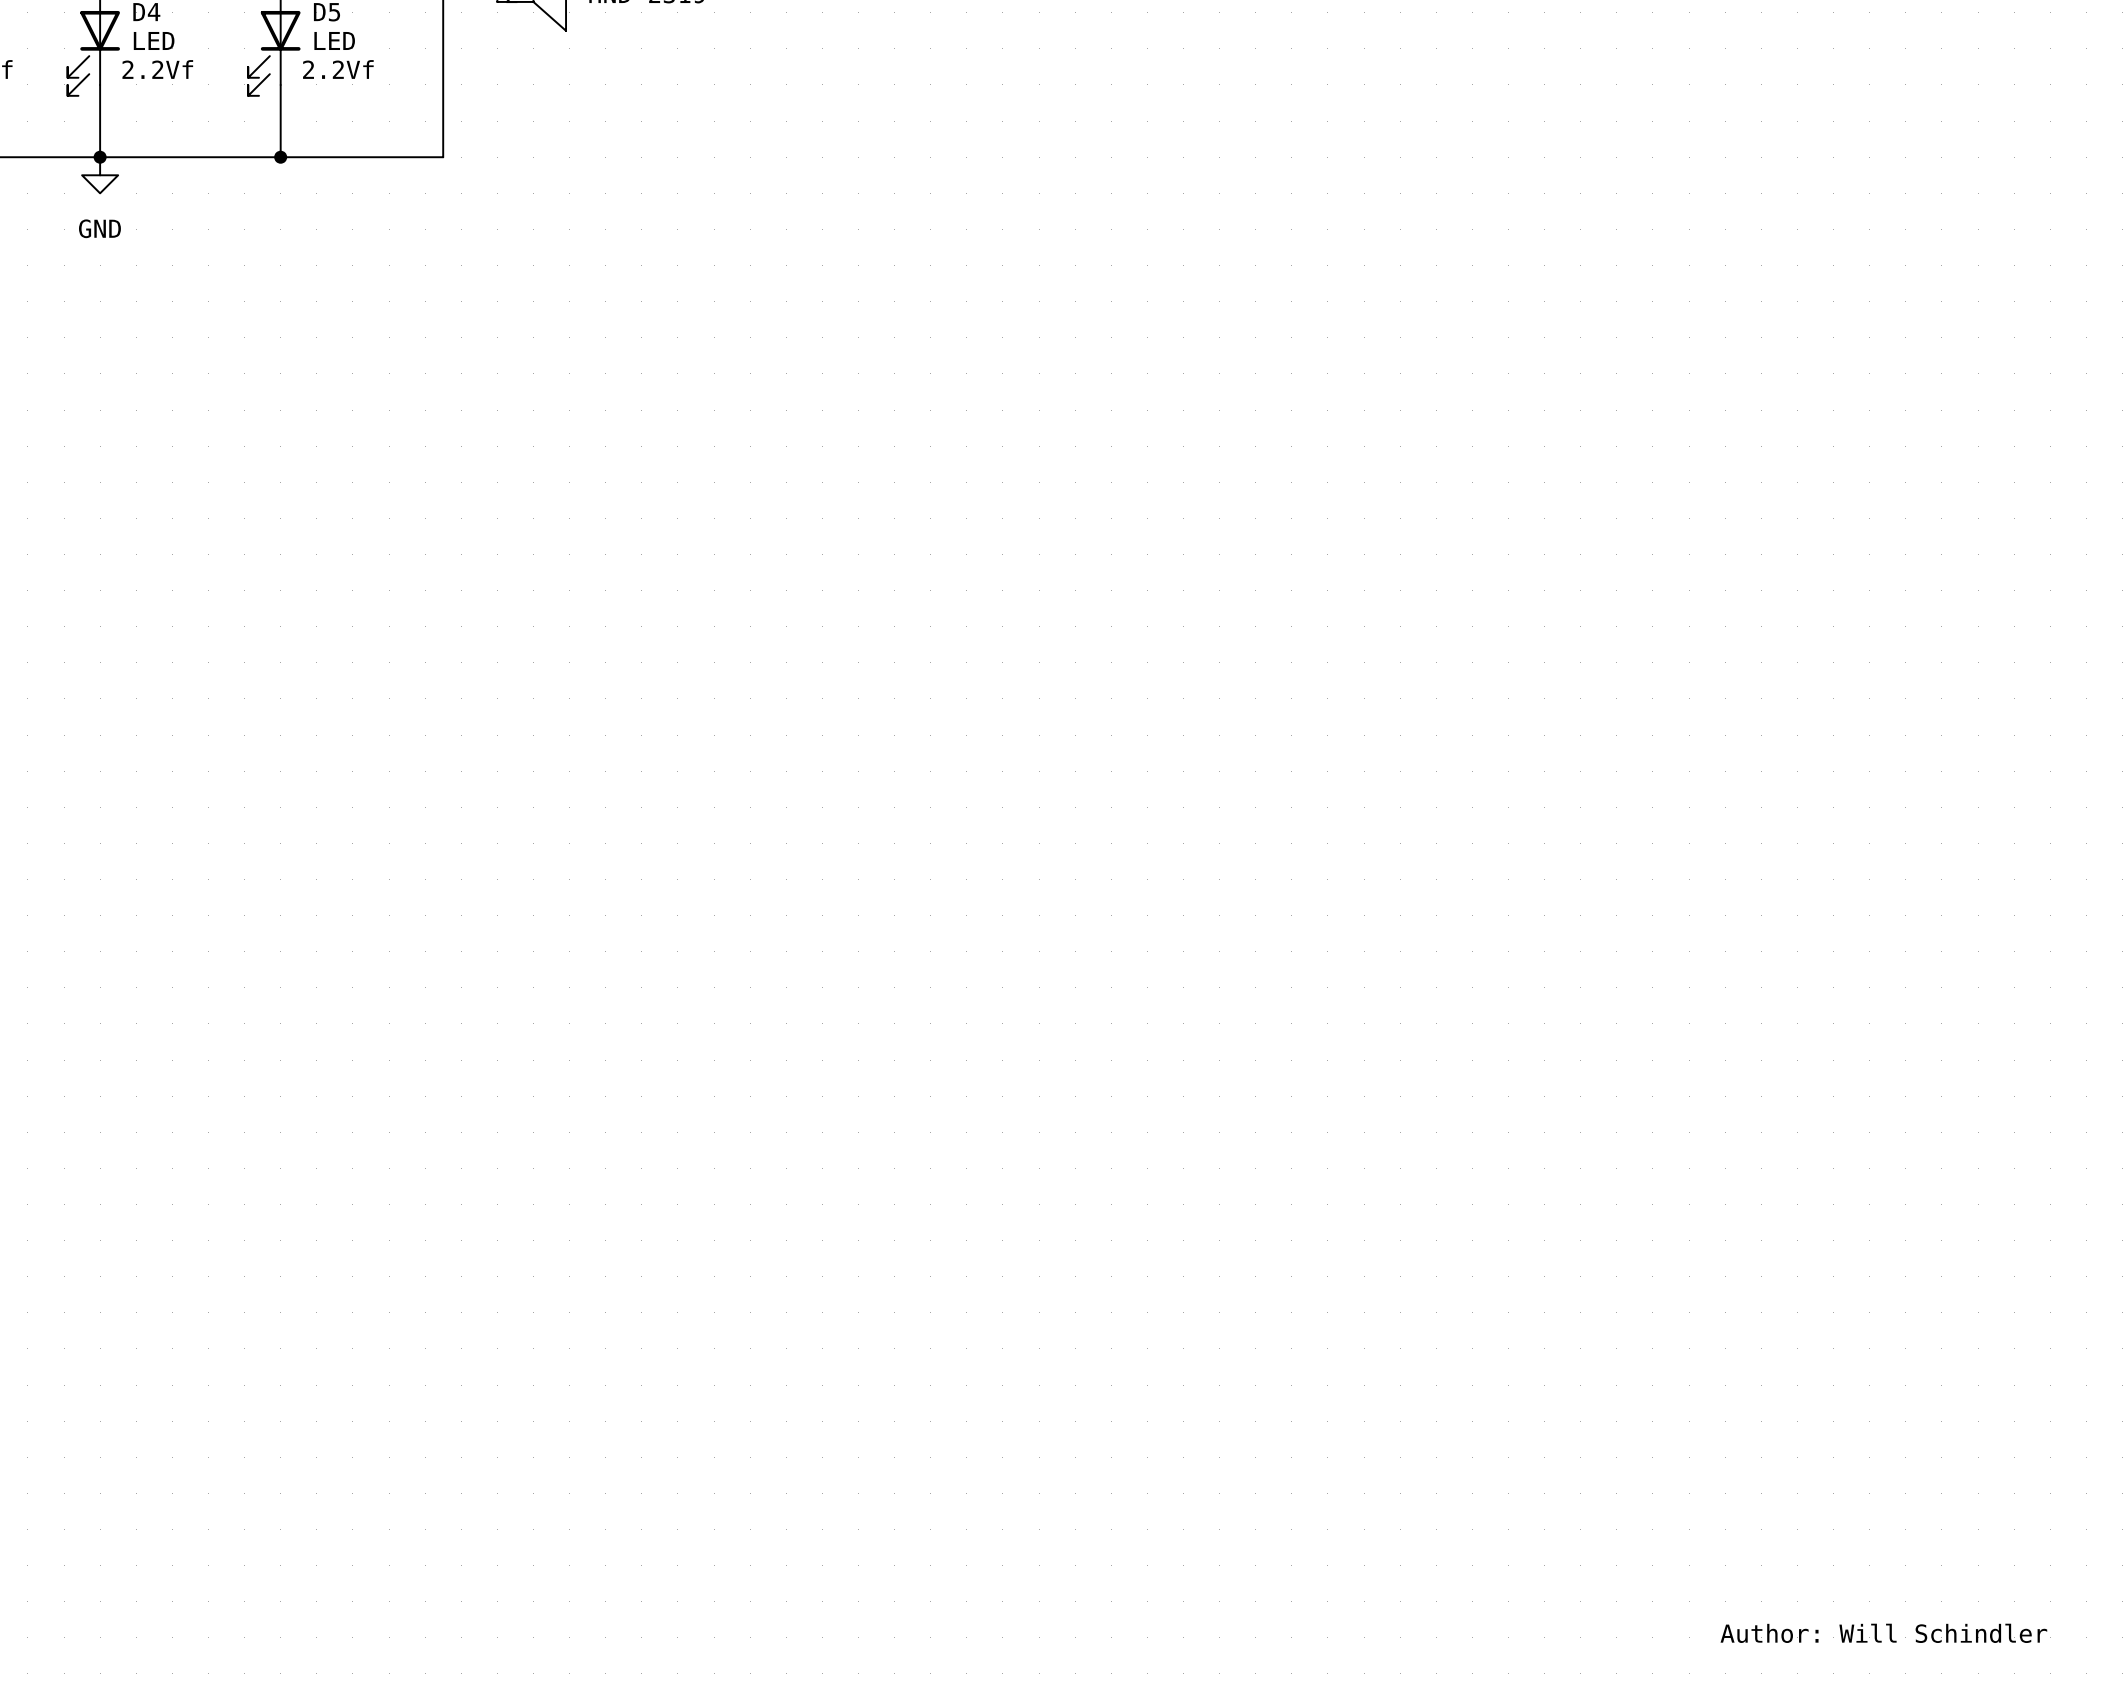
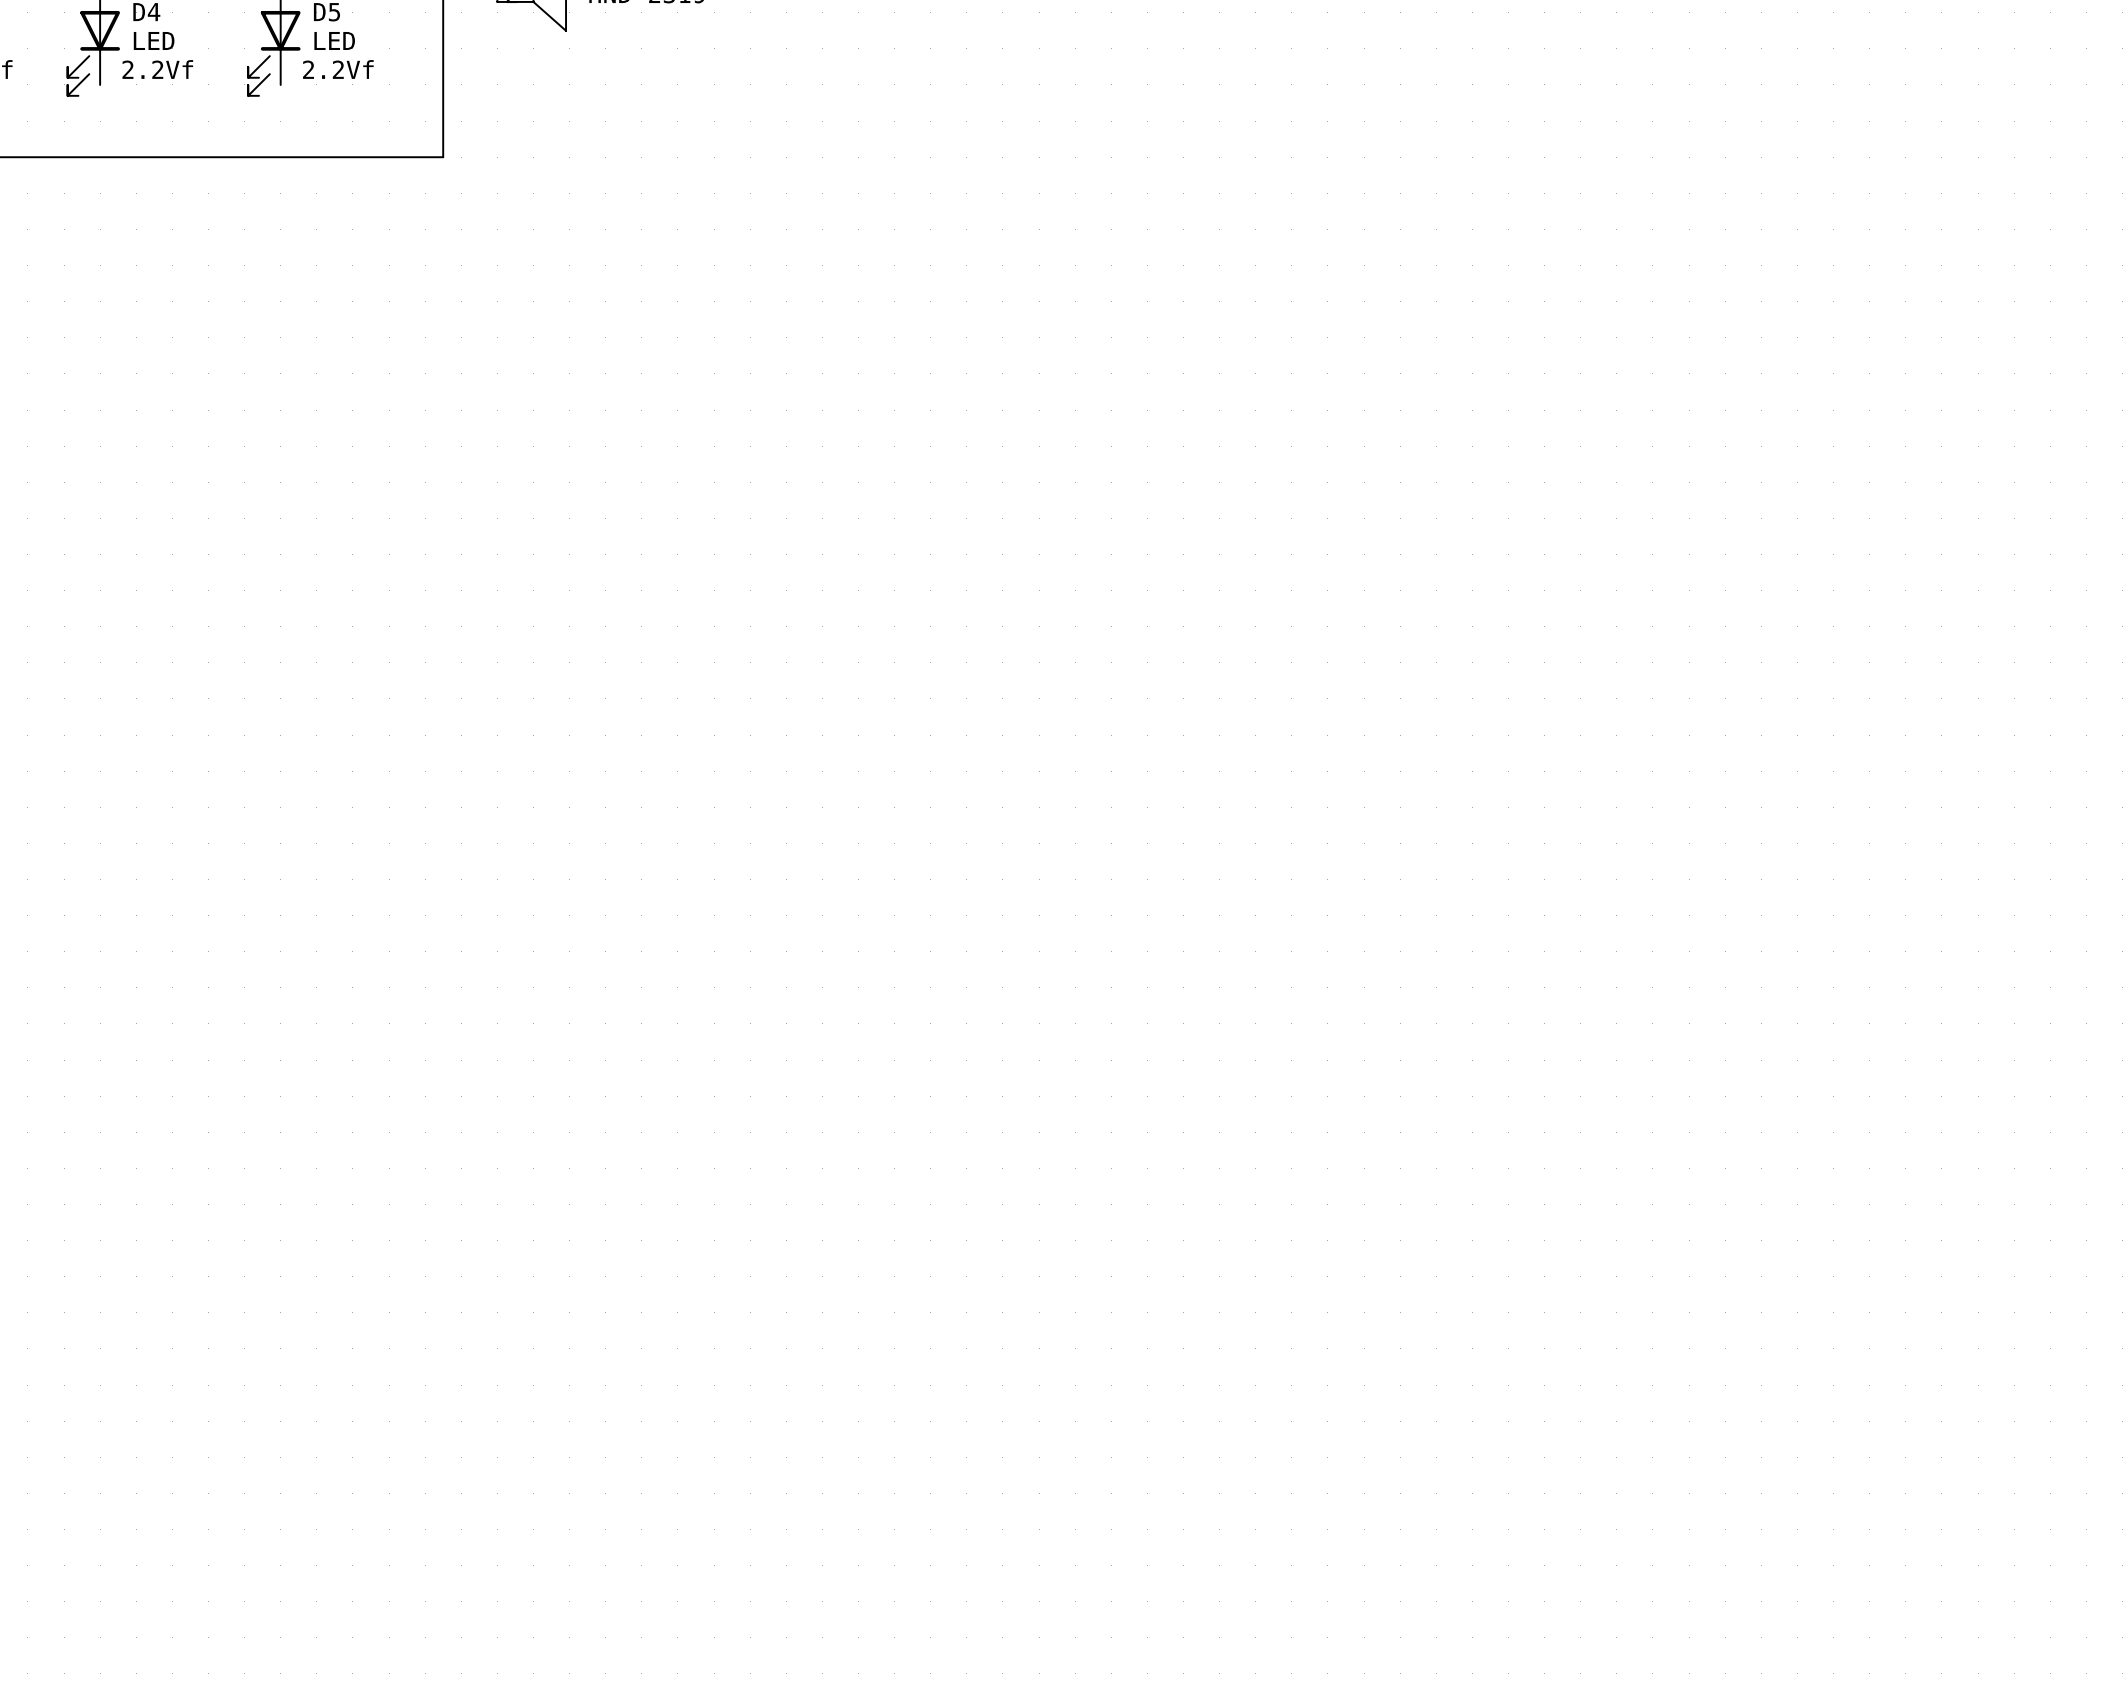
wire: (100, 84) (100, 157) -> none
wire: (280, 84) (280, 157) -> none
junction: (100, 157) -> none
junction: (280, 157) -> none
power symbol: GND (100, 175) -> none
text: Author: Will Schindler (1883, 1633) -> none

